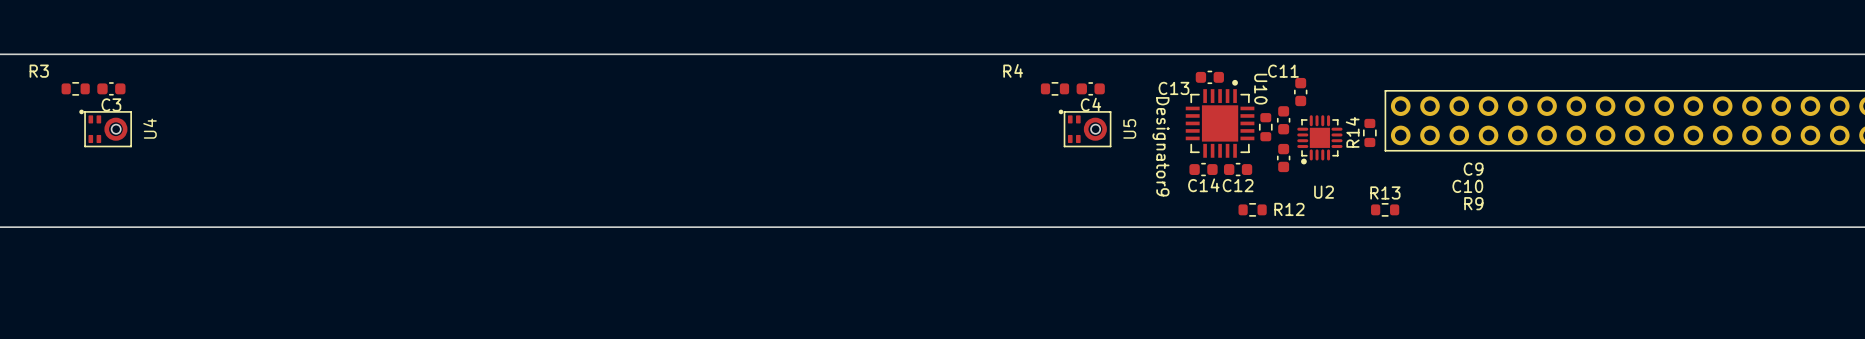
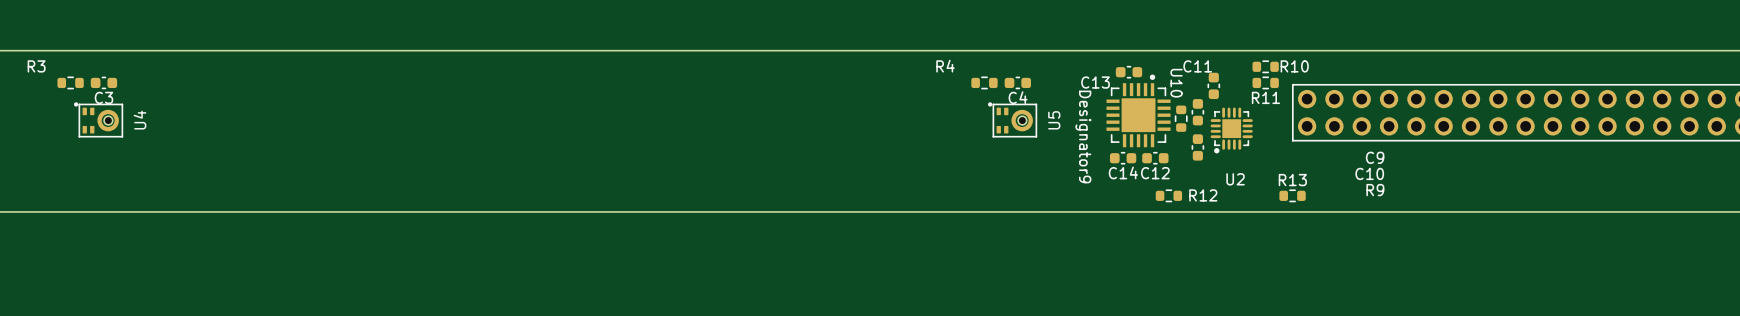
R10: none -> (1265, 66)
R11: none -> (1265, 82)
R14: (1369, 132) -> none

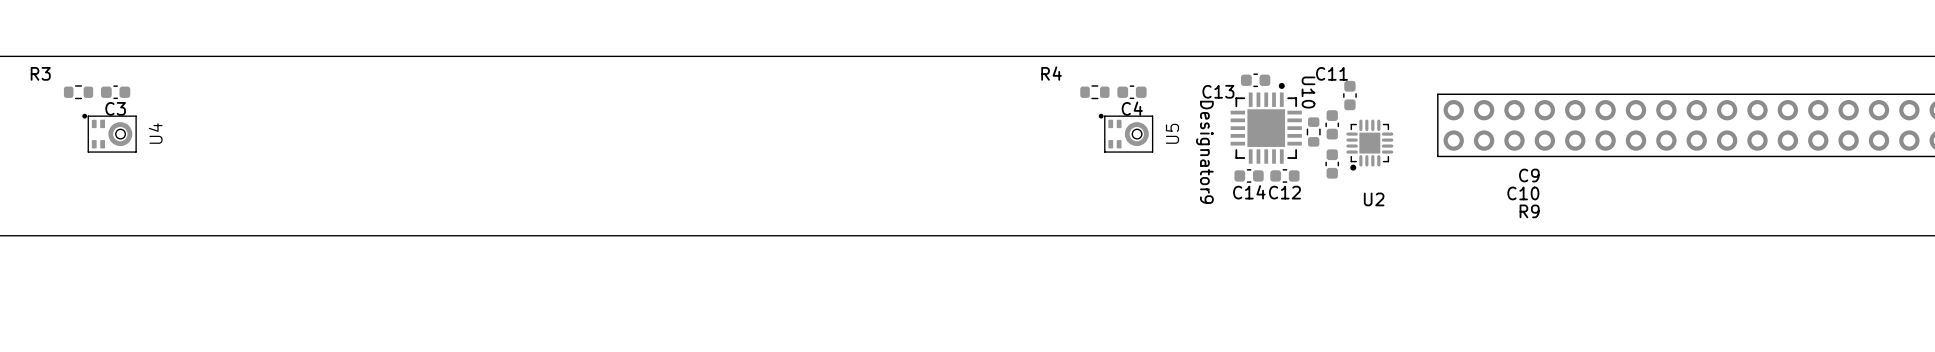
R10: (1265, 66) -> none
R11: (1265, 82) -> none
R12: (1168, 195) -> none
R13: (1292, 195) -> none

